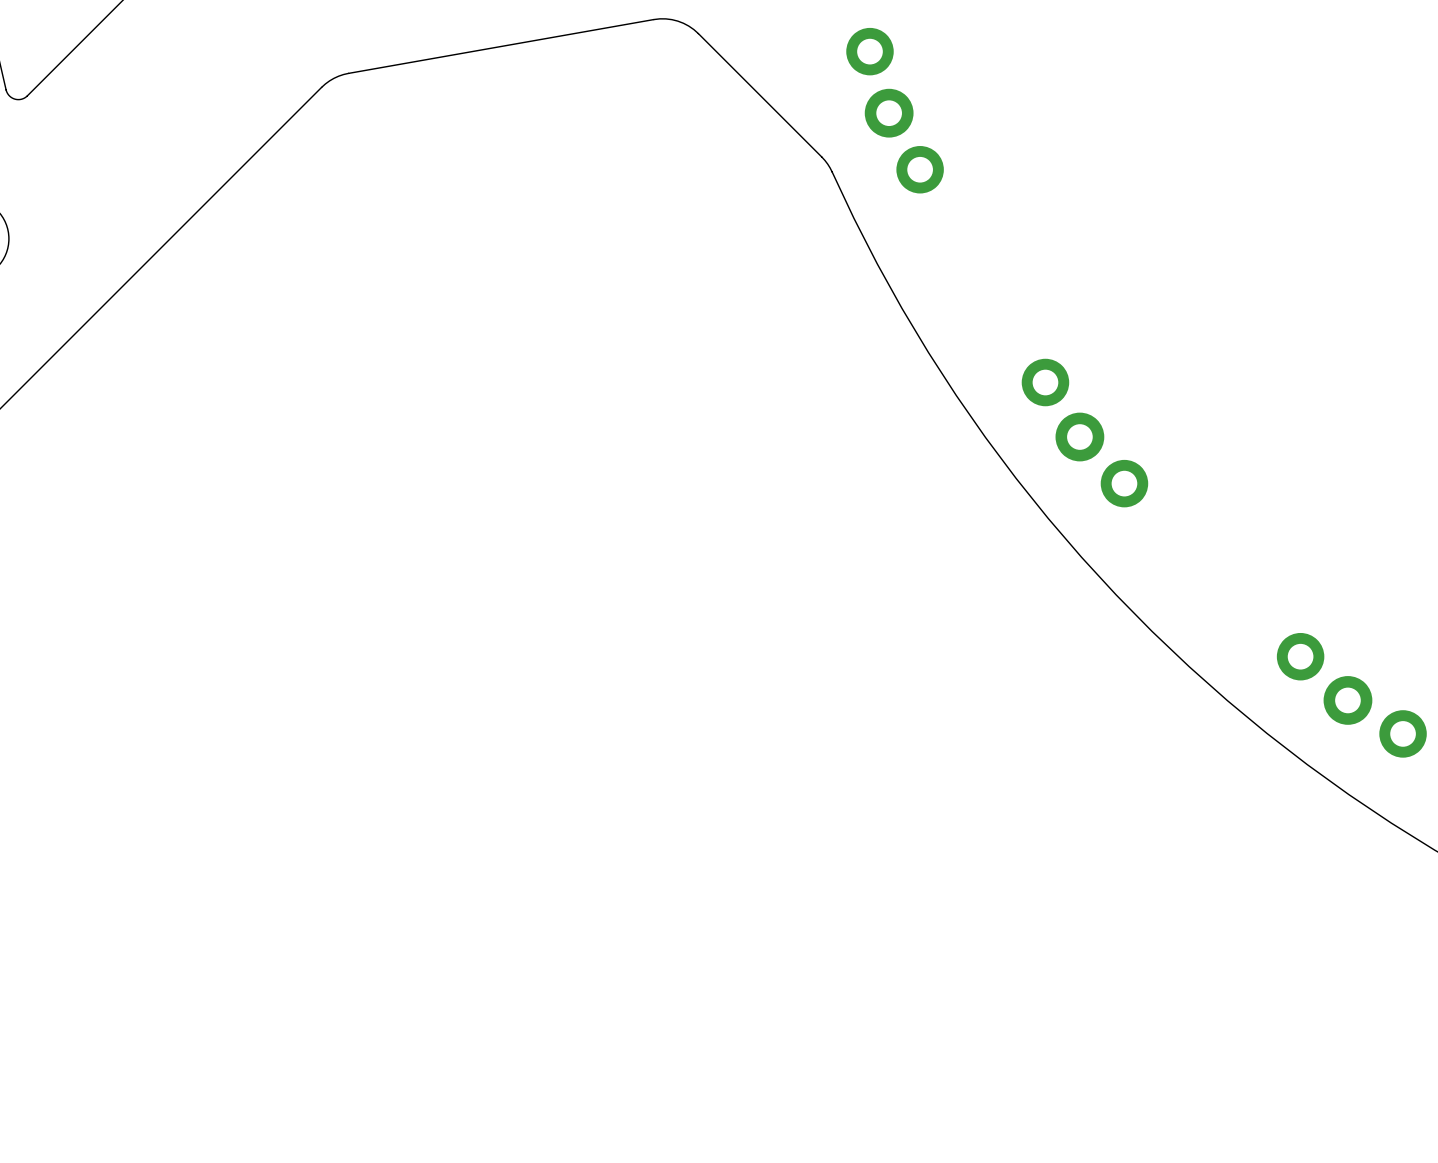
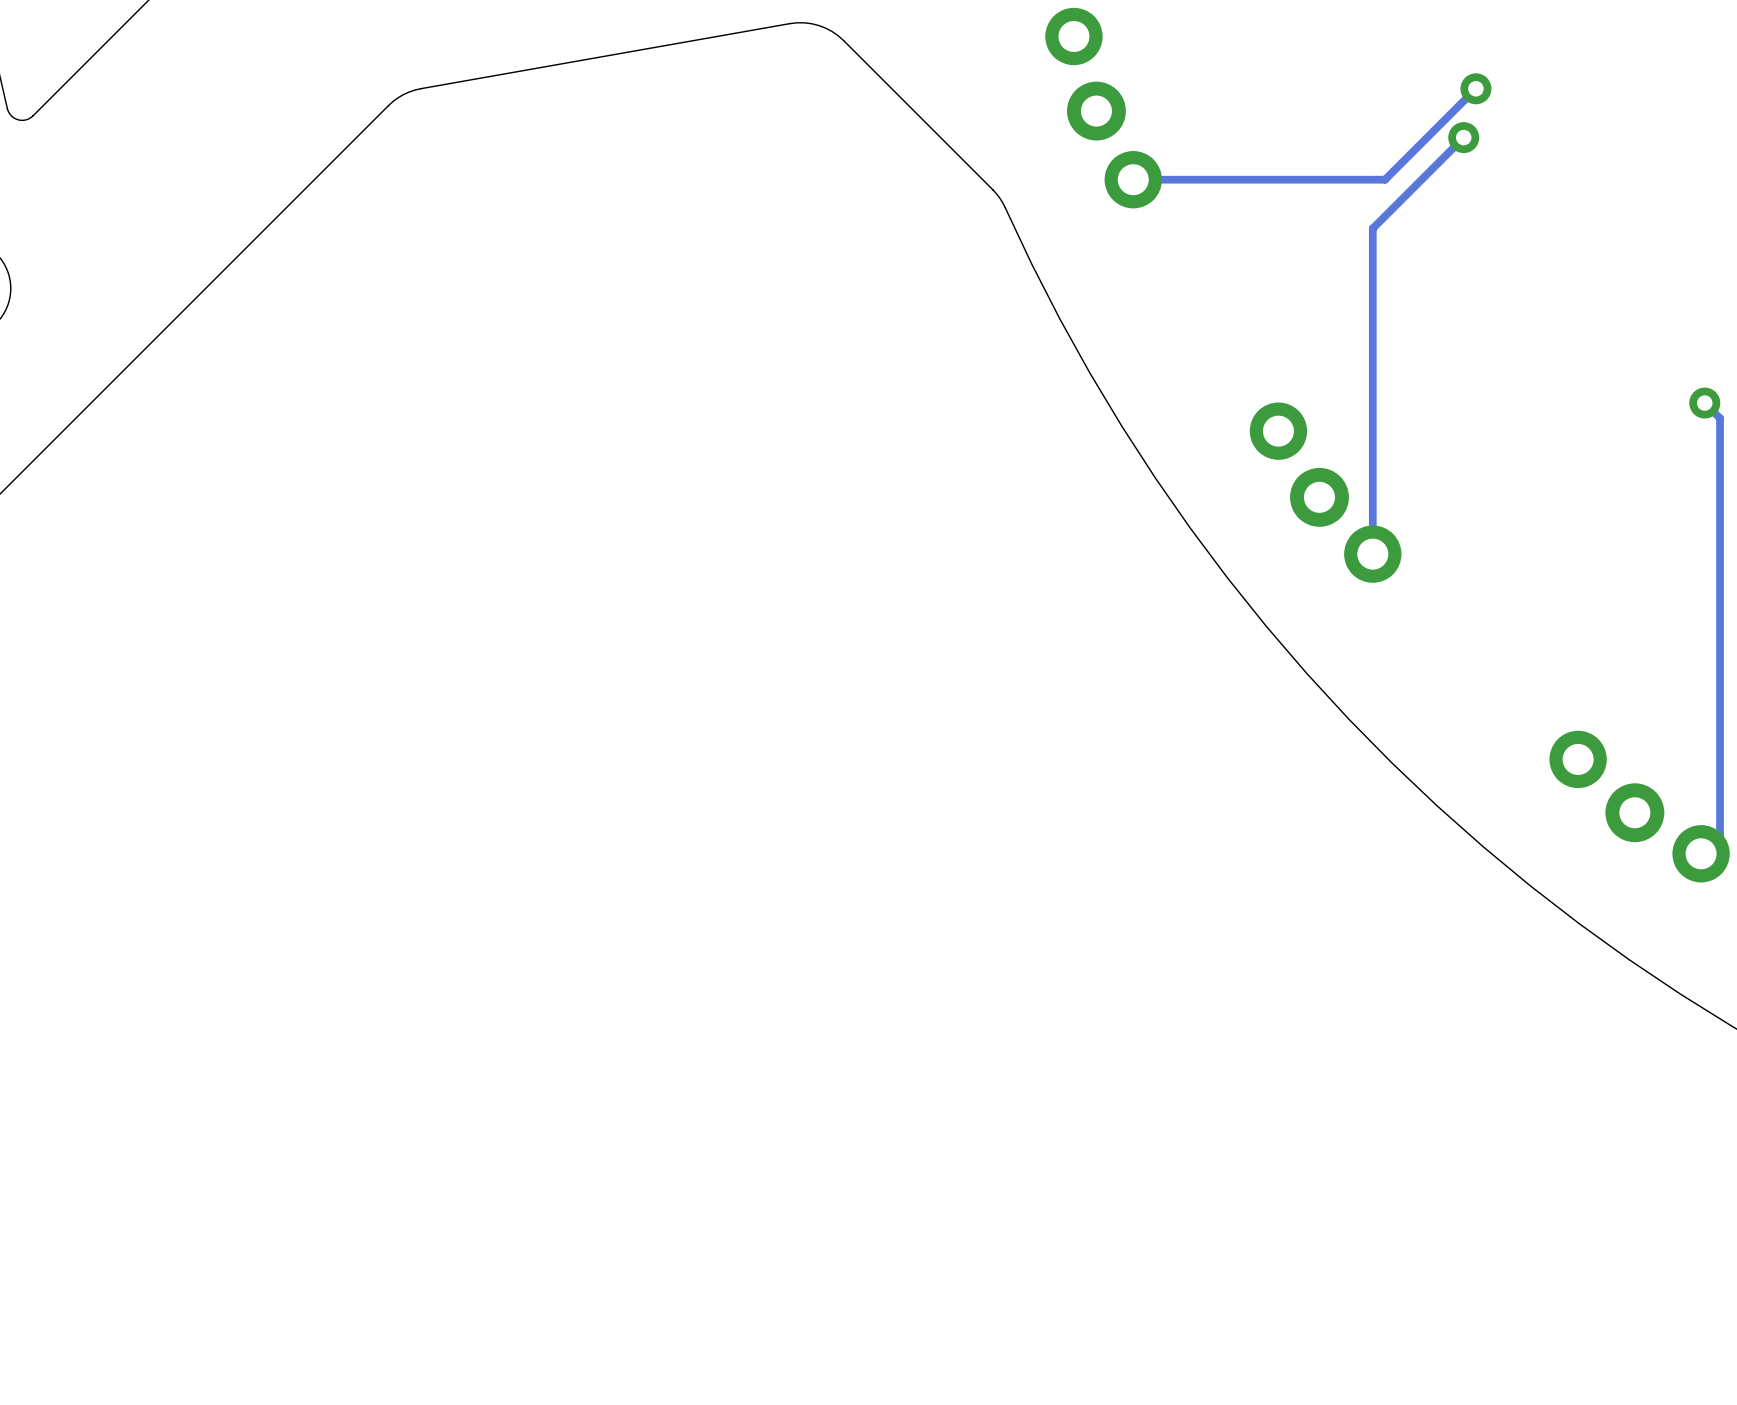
track: none -> (1475, 88) (1385, 179) (1133, 179)
via: none -> (1475, 88)
part: none -> (1103, 108)
part: (895, 110) -> none
track: none -> (1463, 137) (1372, 228) (1372, 554)
via: none -> (1463, 137)
track: none -> (1704, 403) (1720, 418) (1720, 834) (1701, 853)
via: none -> (1704, 403)
part: none -> (1325, 492)
part: (1084, 433) -> none
part: none -> (1639, 806)
part: (1351, 695) -> none

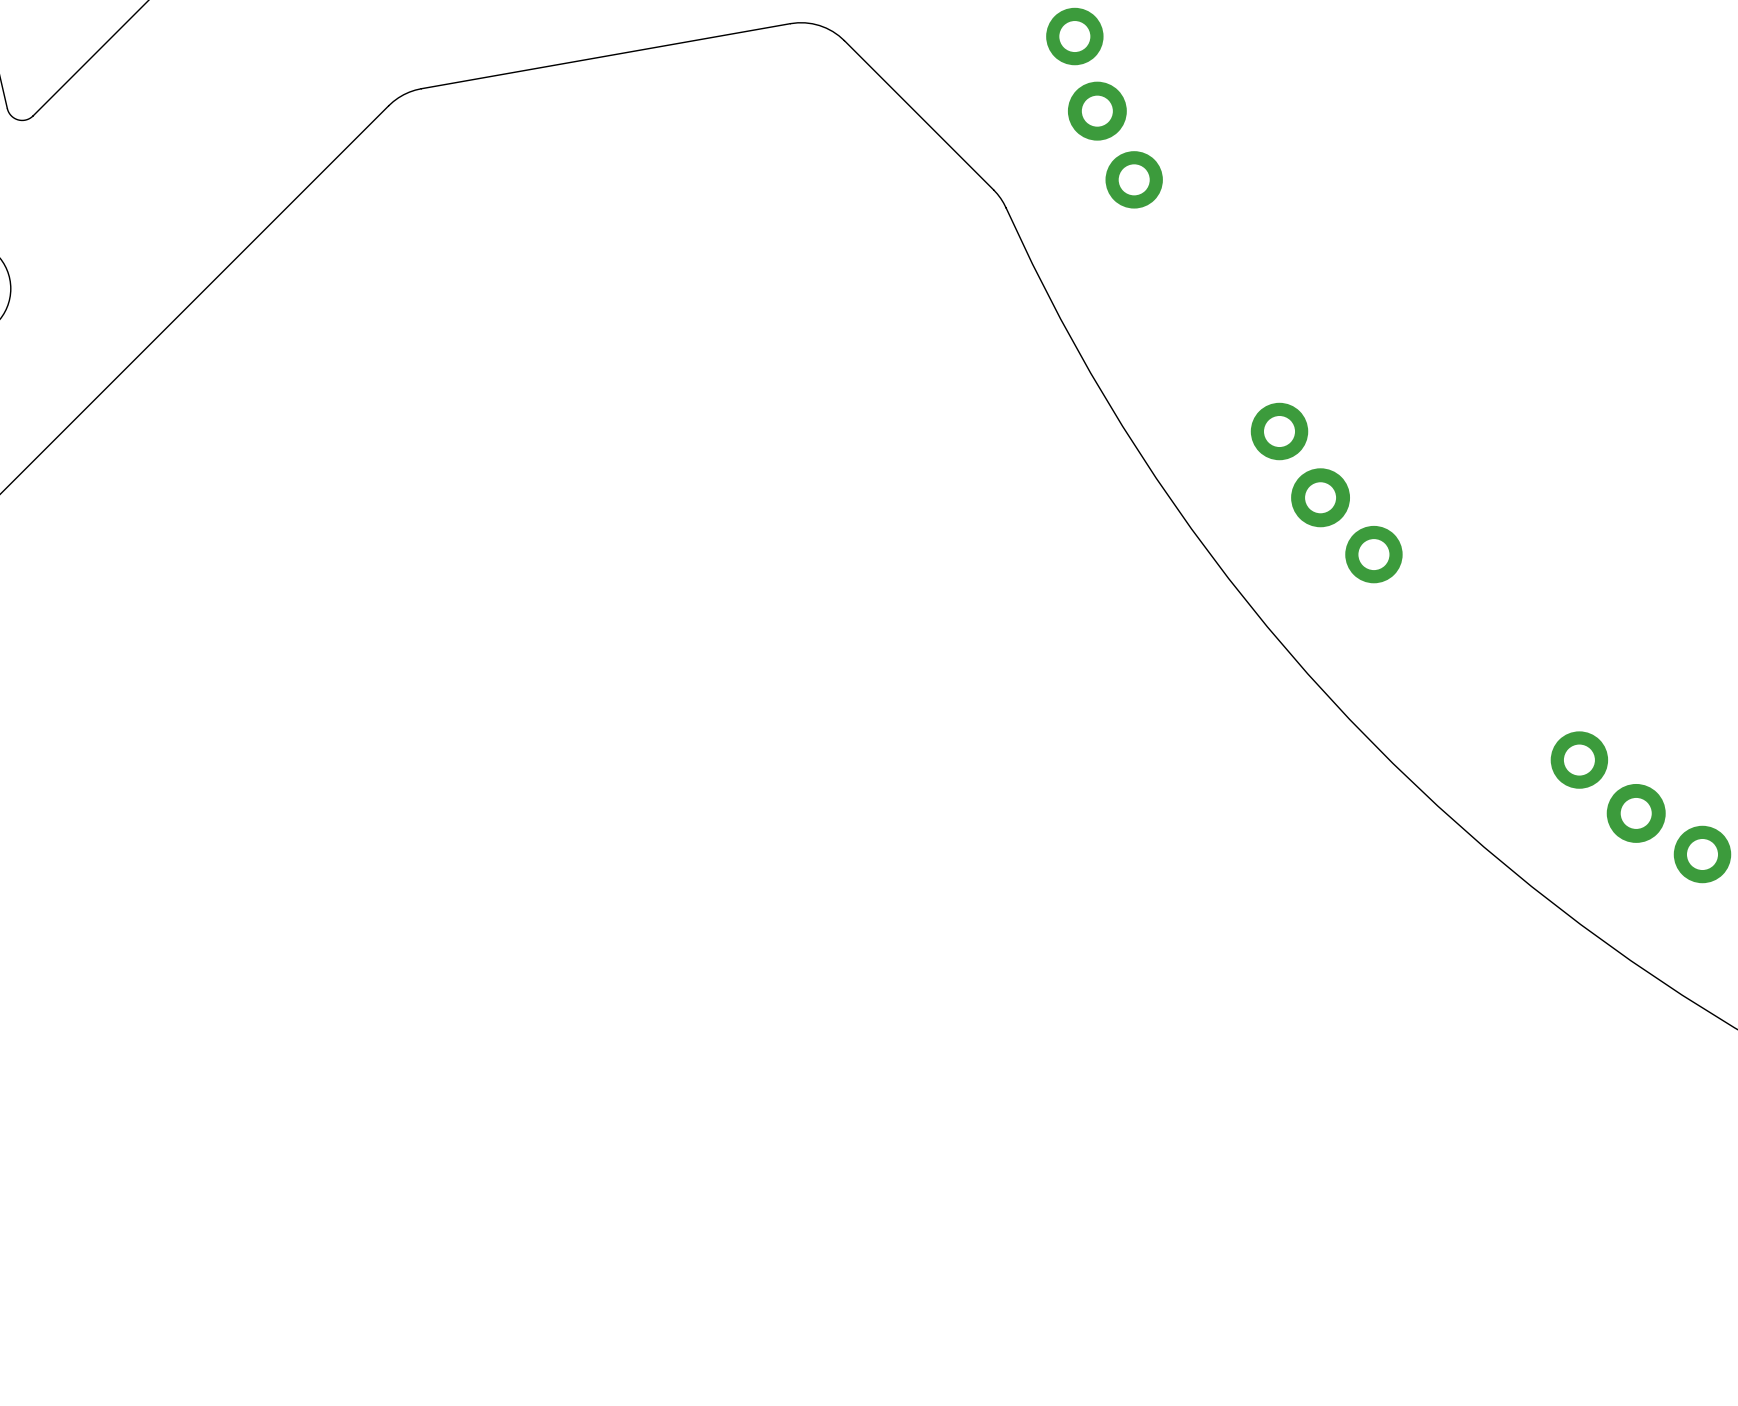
track: (1475, 88) (1385, 179) (1133, 179) -> none
via: (1475, 88) -> none
track: (1463, 137) (1372, 228) (1372, 554) -> none
via: (1463, 137) -> none
track: (1704, 403) (1720, 418) (1720, 834) (1701, 853) -> none
via: (1704, 403) -> none

